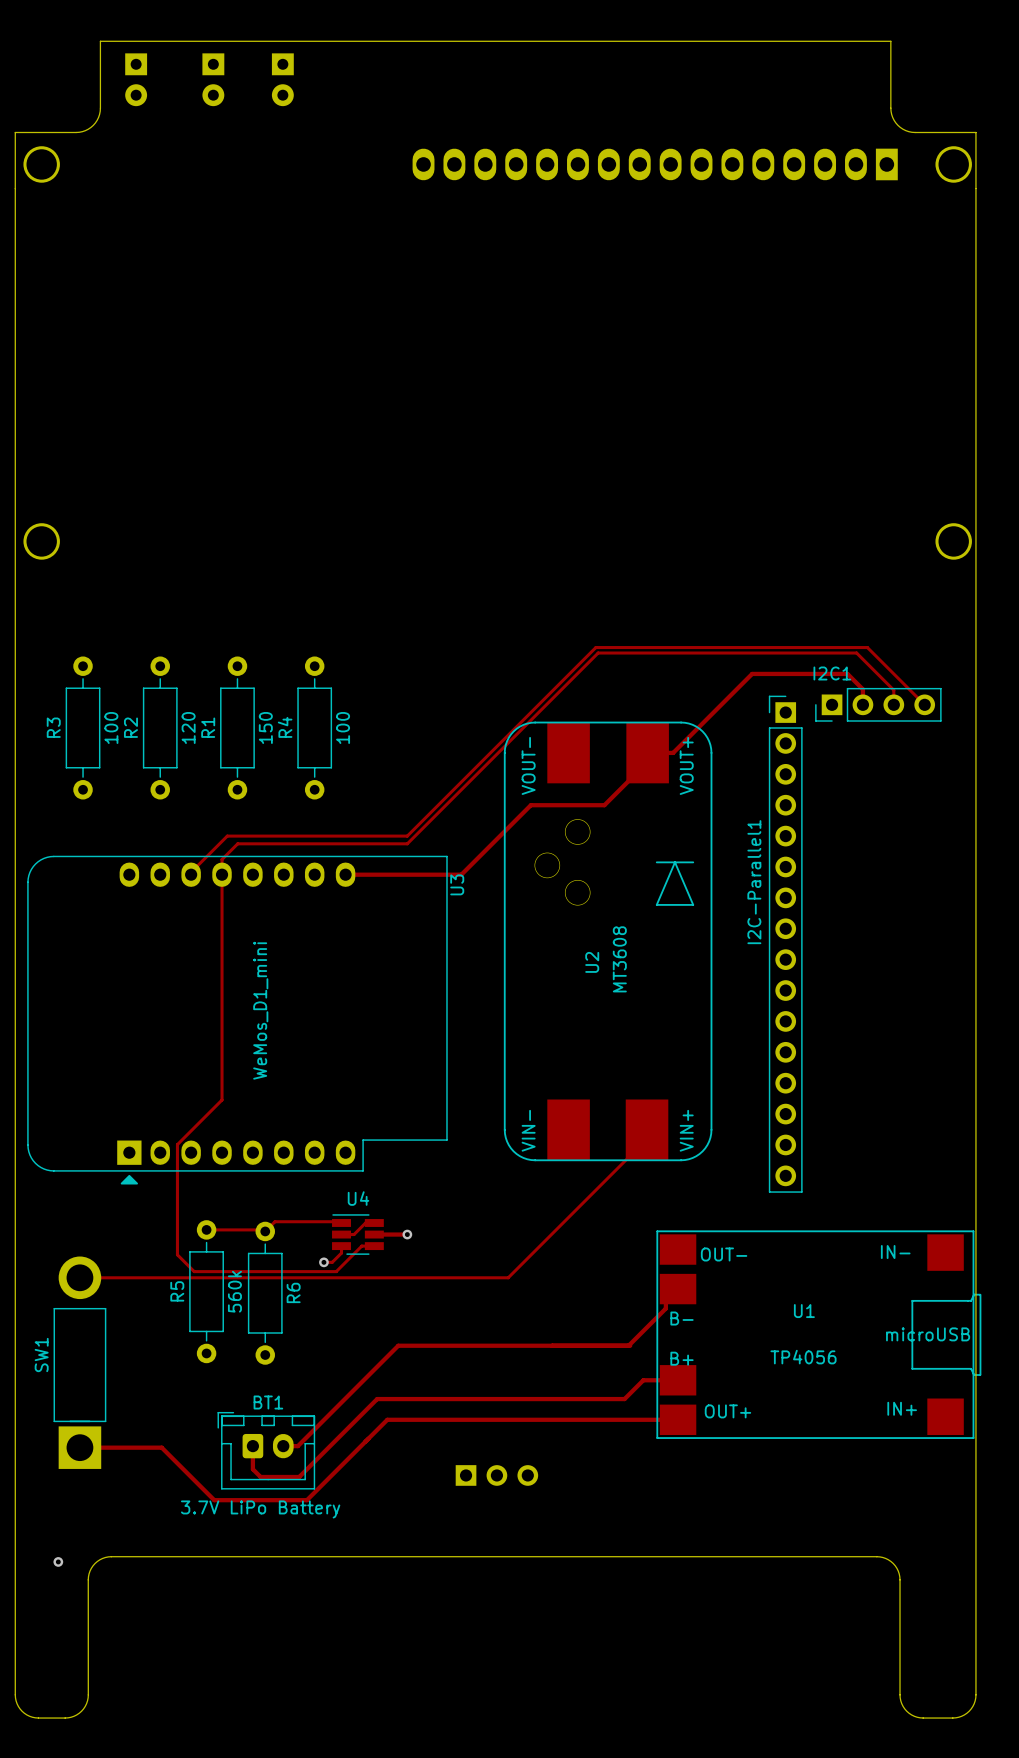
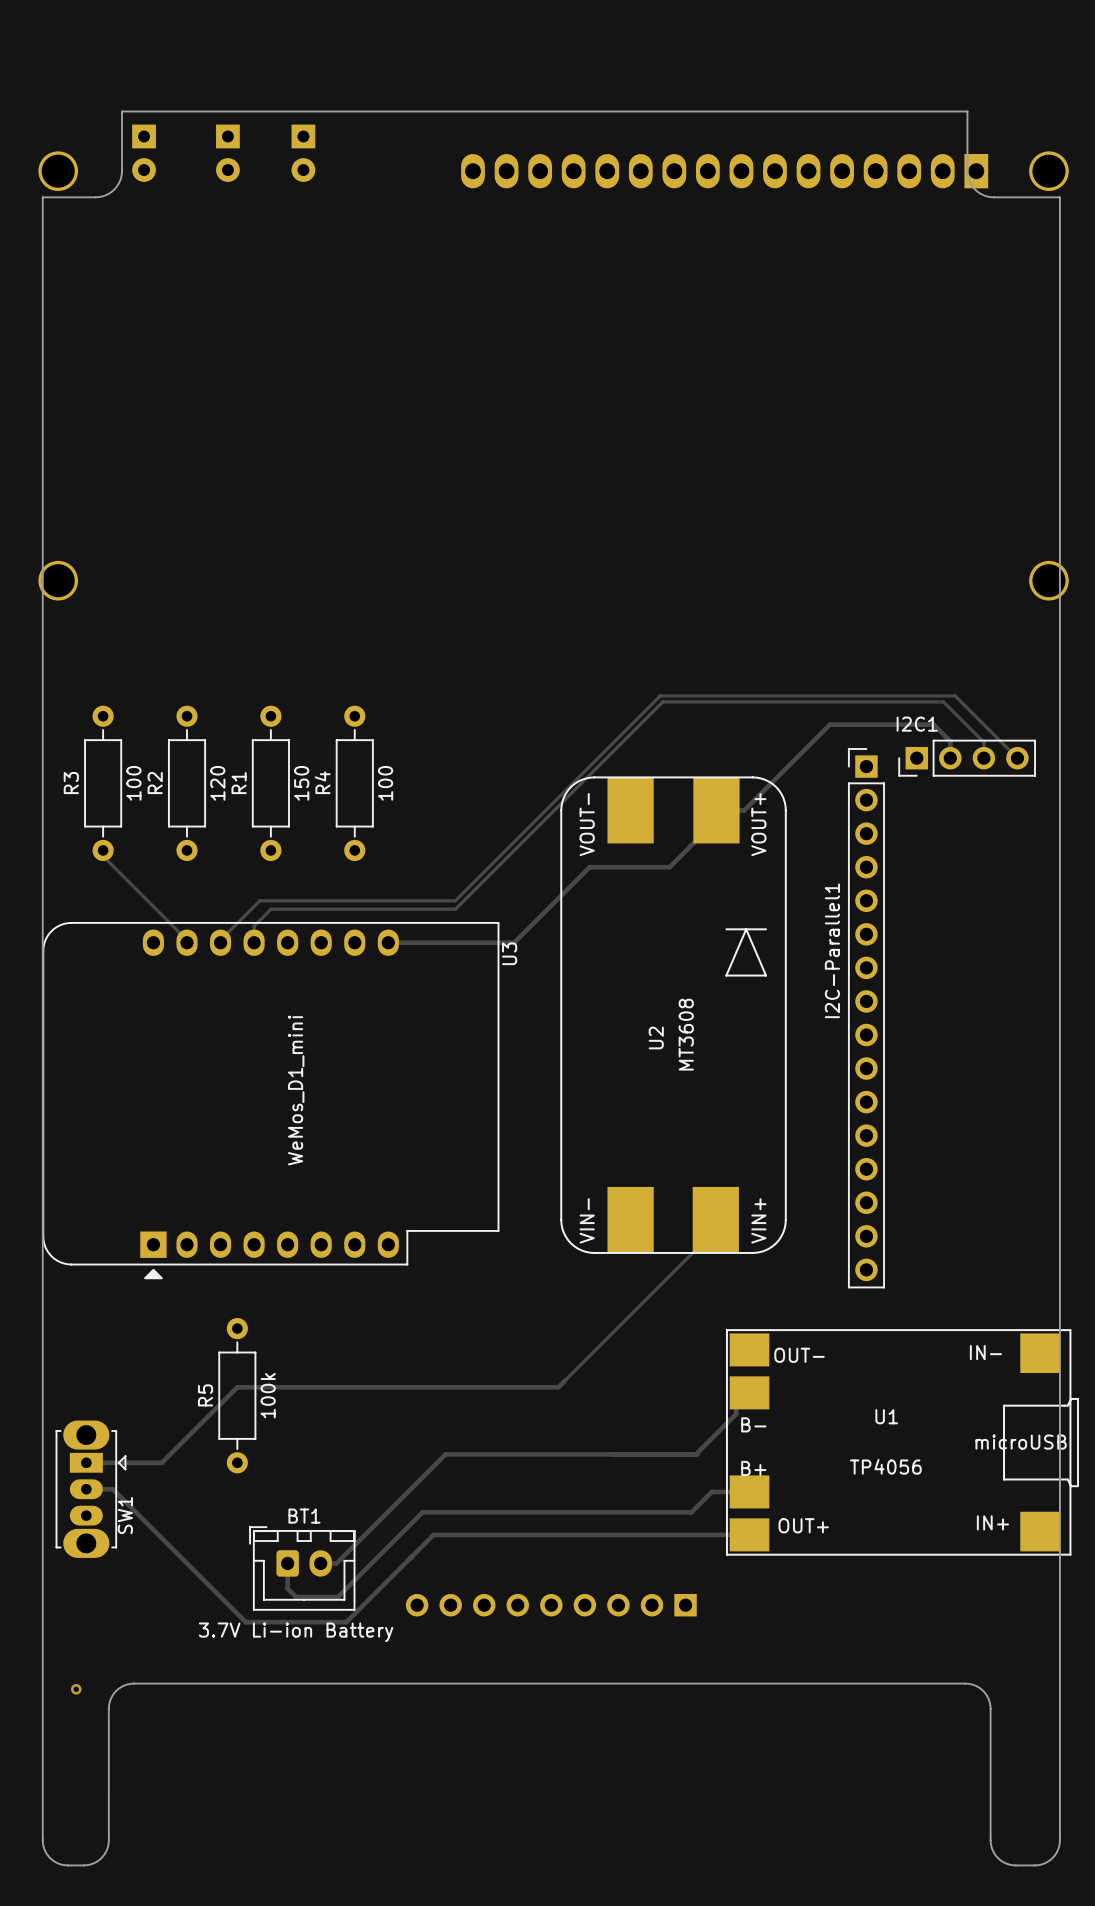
part: (136, 79) -> none
part: (213, 79) -> none
part: (282, 79) -> none
part: none -> (144, 153)
part: none -> (227, 153)
part: none -> (303, 153)
U2 footprint: [503, 721, 713, 1162] -> [560, 776, 787, 1254]
track: none -> (103, 856) (187, 940)
track: (222, 874) (222, 1100) (177, 1144) (177, 1254) (194, 1271) (336, 1271) (361, 1246) (374, 1246) -> none
track: (341, 1222) (274, 1221) (265, 1231) (263, 1229) (206, 1229) -> none
track: (374, 1222) (365, 1222) (354, 1234) (341, 1234) -> none
U4: (357, 1234) -> none
track: (374, 1234) (407, 1234) -> none
via: (407, 1234) -> none
track: (341, 1246) (341, 1253) (332, 1262) (323, 1262) -> none
SW1 footprint: [53, 1256, 107, 1469] -> [55, 1420, 127, 1558]
via: (323, 1262) -> none
track: (67, 1277) (508, 1277) -> (86, 1462) (161, 1462) (237, 1387) (558, 1387) (565, 1380)
R5 value: 560k (234, 1291) -> 100k (268, 1395)
R6: (265, 1293) -> none
SW1 name position: SW1 (41, 1355) -> SW1 (125, 1515)
track: (67, 1447) (161, 1447) -> (86, 1489) (112, 1489) (188, 1565)
part footprint: [455, 1465, 539, 1486] -> [405, 1593, 697, 1617]
BT1 value: 3.7V LiPo Battery (260, 1509) -> 3.7V Li-ion Battery (296, 1632)
board edge: (88, 1694) (86, 1703) (81, 1711) (74, 1716) (65, 1718) (29, 1716) (20, 1708) (15, 1694) (15, 132) (79, 132) (93, 125) (100, 111) (100, 41) (890, 41) (891, 111) (897, 125) (911, 132) (975, 132) (975, 1694) (974, 1703) (969, 1711) (961, 1716) (952, 1718) (914, 1716) (904, 1708) (900, 1694) -> (108, 1833) (108, 1846) (103, 1855) (96, 1862) (86, 1865) (58, 1863) (47, 1855) (42, 1843) (42, 197) (99, 197) (114, 189) (121, 174) (122, 111) (967, 111) (967, 174) (975, 189) (990, 197) (1059, 197) (1059, 1843) (1054, 1855) (1044, 1863) (1012, 1865) (1003, 1862) (995, 1855) (991, 1846) (990, 1833)

